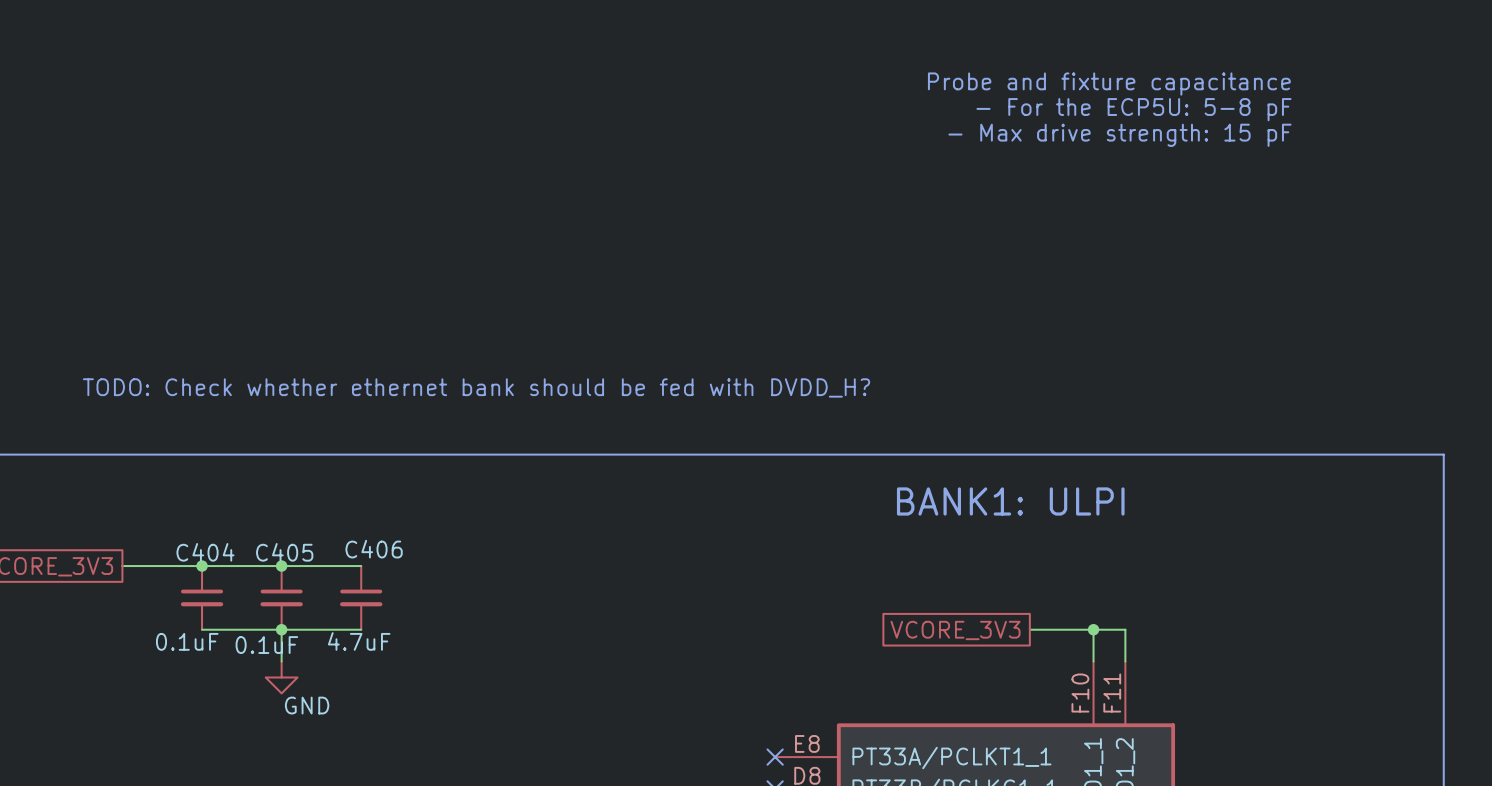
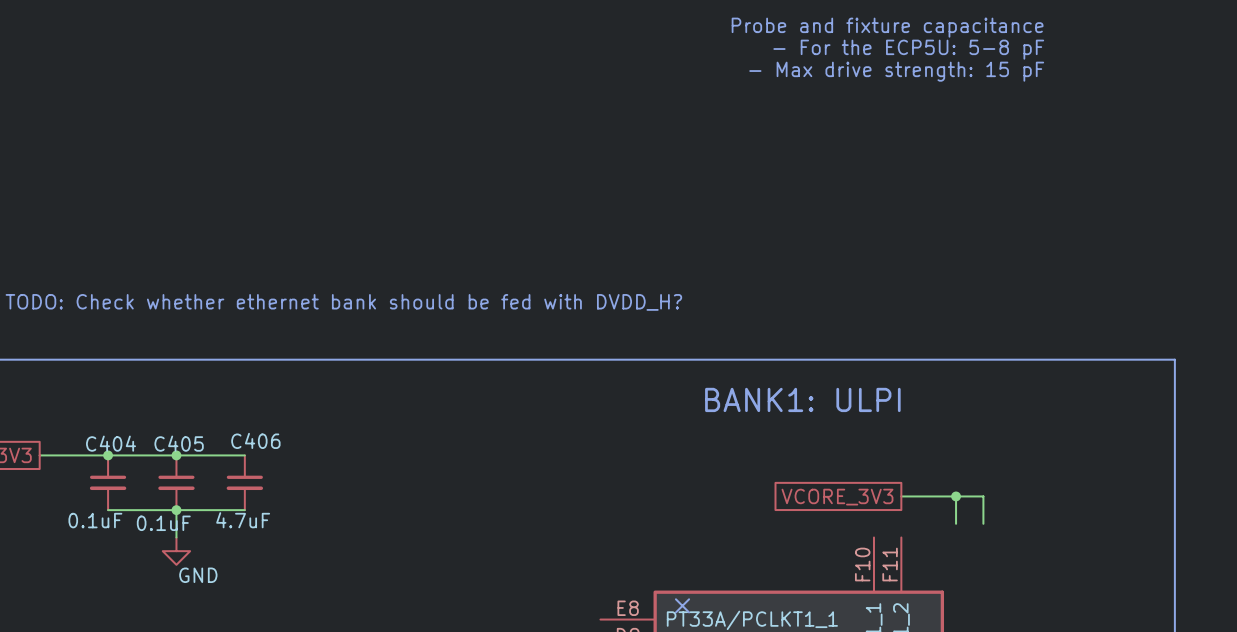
text position: Probe and fixture capacitance (1109, 84) -> Probe and fixture capacitance (887, 27)
text position: - For the ECP5U: 5-8 pF (1133, 109) -> - For the ECP5U: 5-8 pF (908, 49)
text position: - Max drive strength: 15 pF (1119, 135) -> - Max drive strength: 15 pF (896, 71)
junction: none -> (956, 496)
wire: (1029, 629) (1125, 629) (1125, 661) -> (901, 496) (983, 496) (983, 523)
wire: (1093, 629) (1093, 661) -> (956, 496) (956, 523)
junction: (1093, 629) -> none
global label position: VCORE_3V3 (955, 630) -> VCORE_3V3 (837, 497)
no-connect mark: none -> (682, 605)
no-connect mark: (775, 757) -> none

